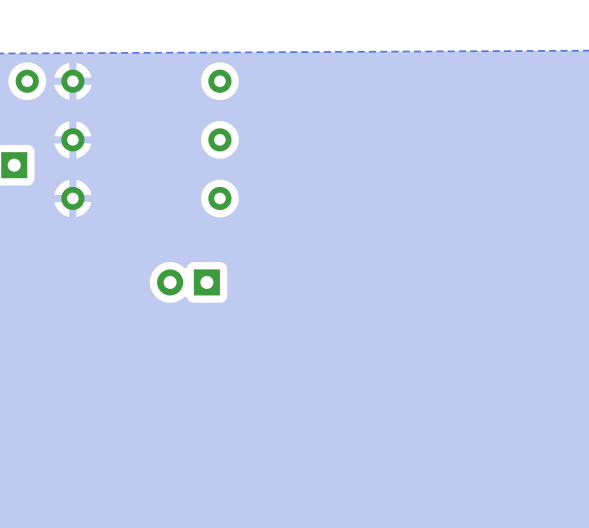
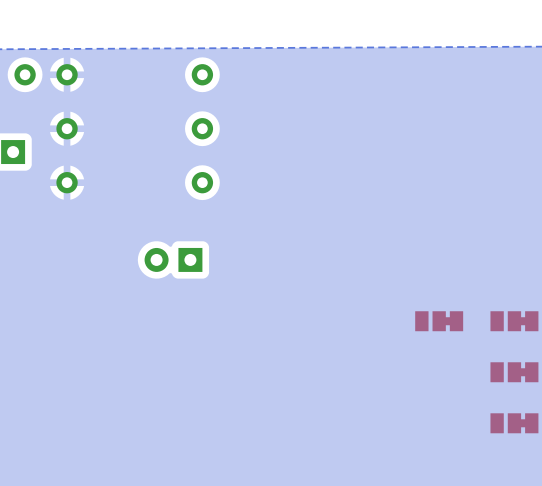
part: none -> (439, 321)
part: none -> (514, 321)
part: none -> (514, 372)
part: none -> (514, 423)

